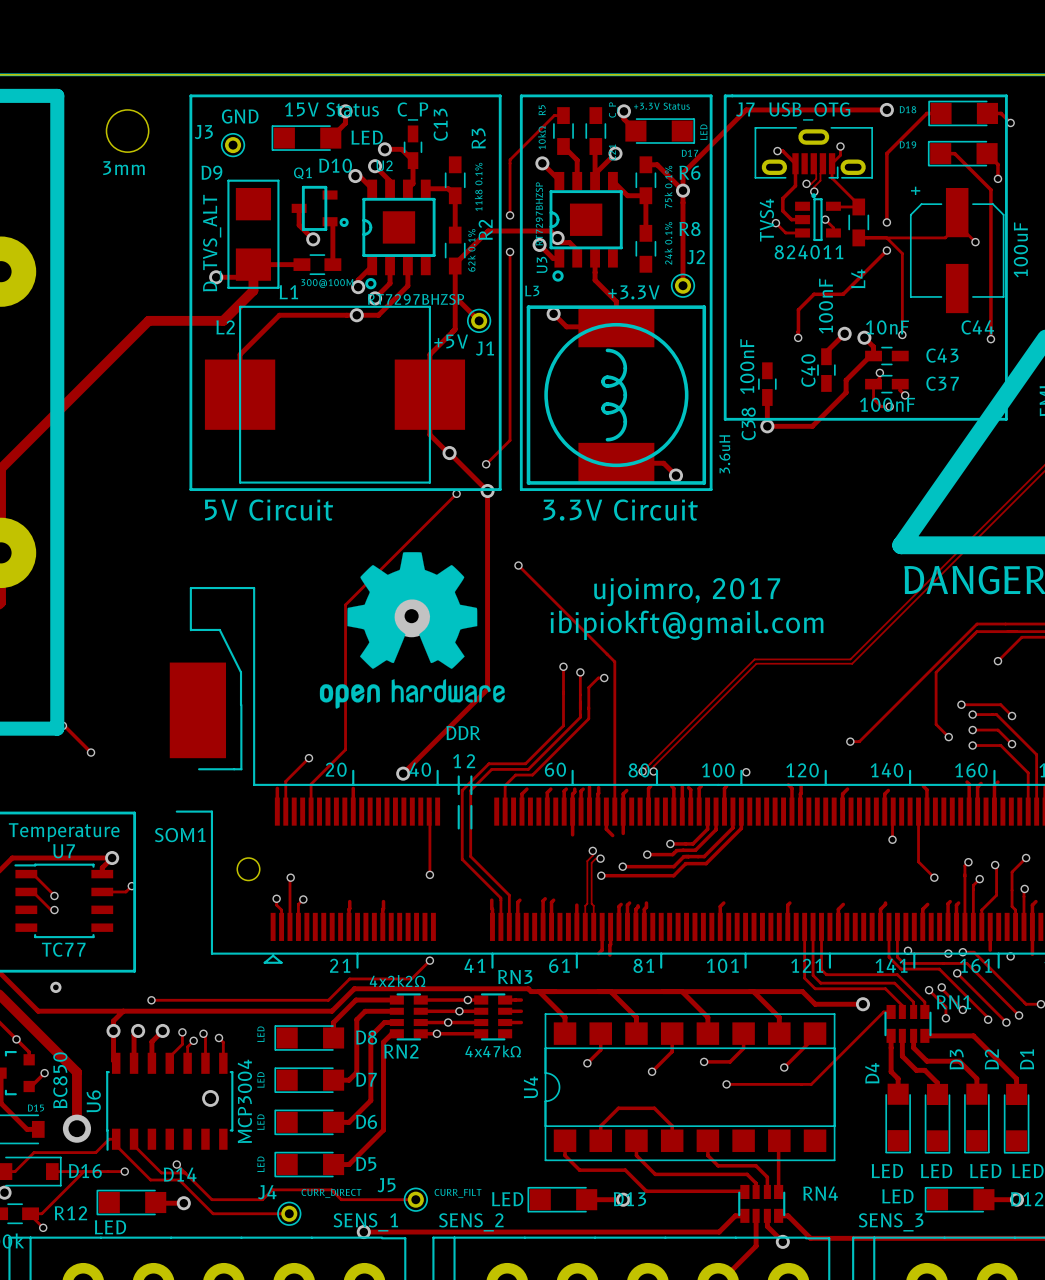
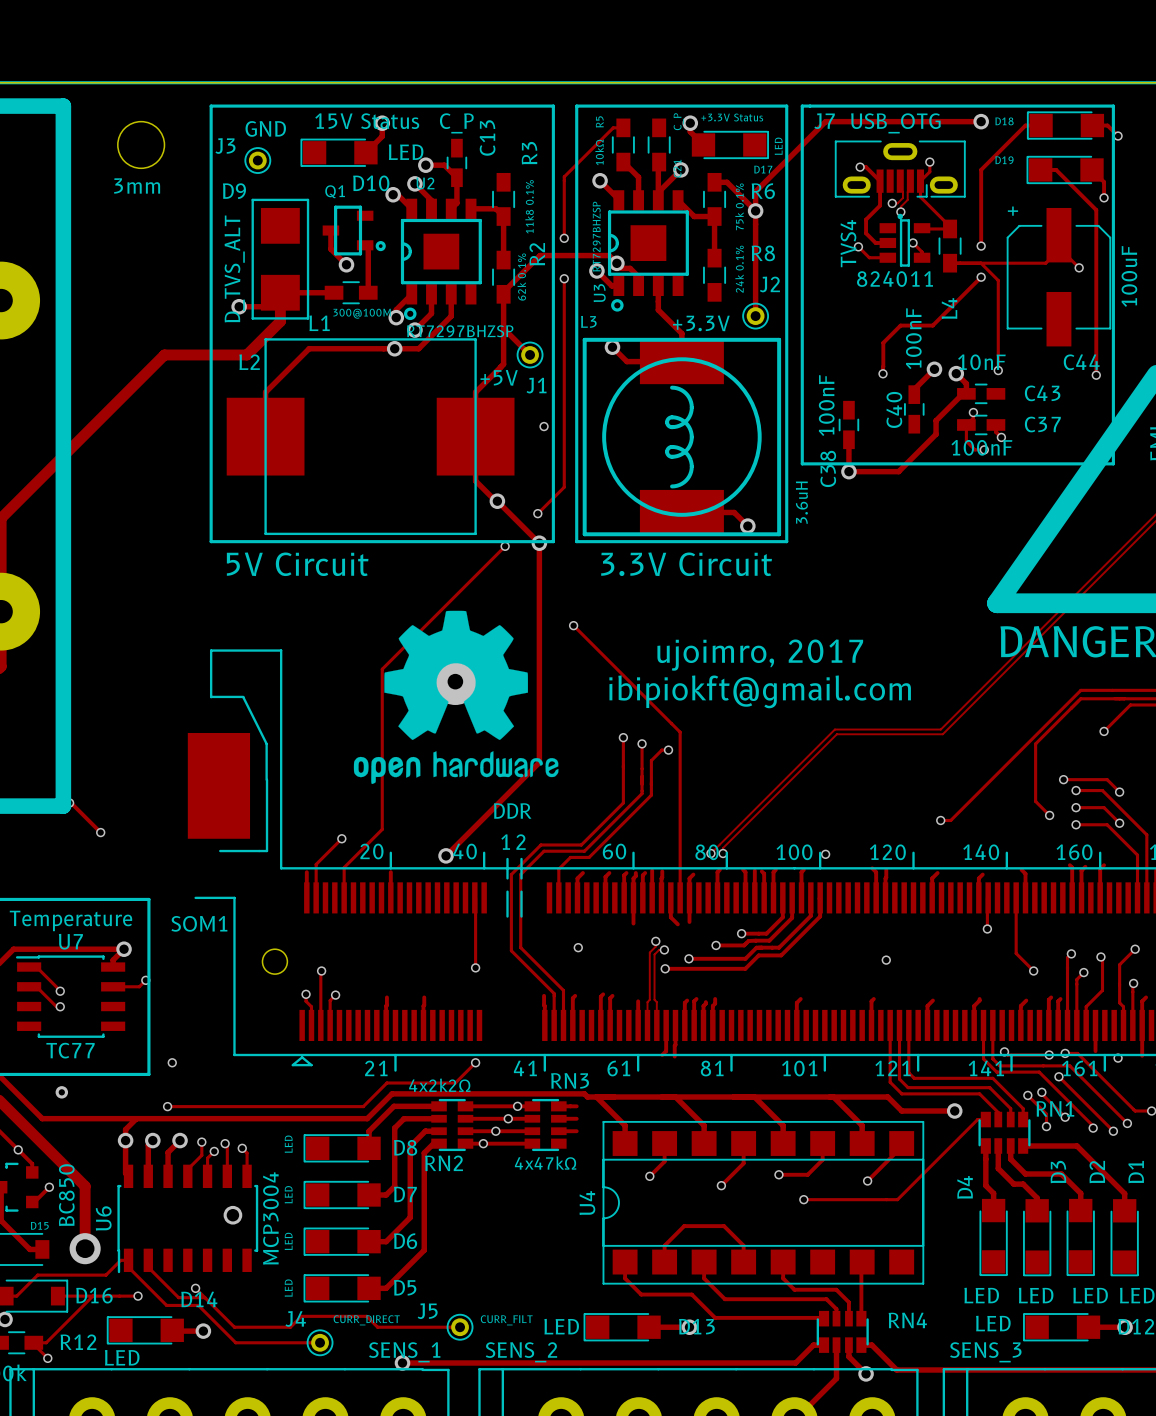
via: none -> (544, 426)
via: none -> (578, 947)
via: none -> (886, 960)
via: none -> (172, 1062)

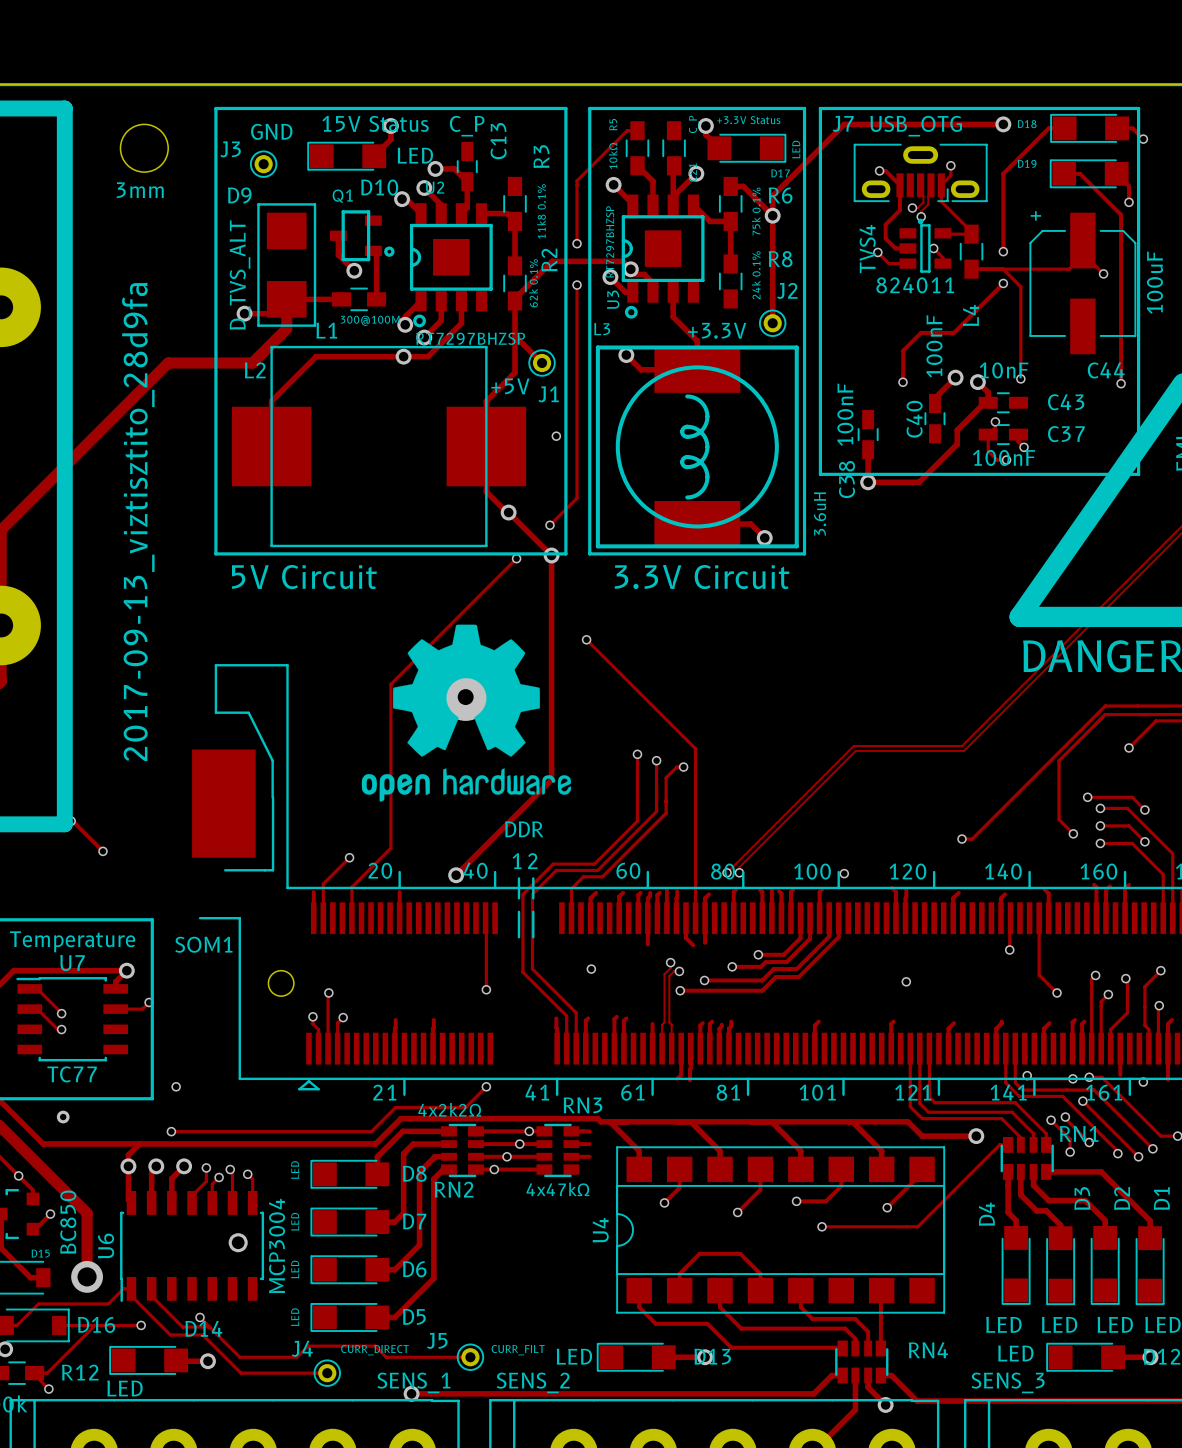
text: none -> 2017-09-13_viztisztito_28d9fa (138, 521)
text: ujoimro, 2017 (760, 655) -> none
text: ibipiokft@gmail.com (760, 691) -> none

